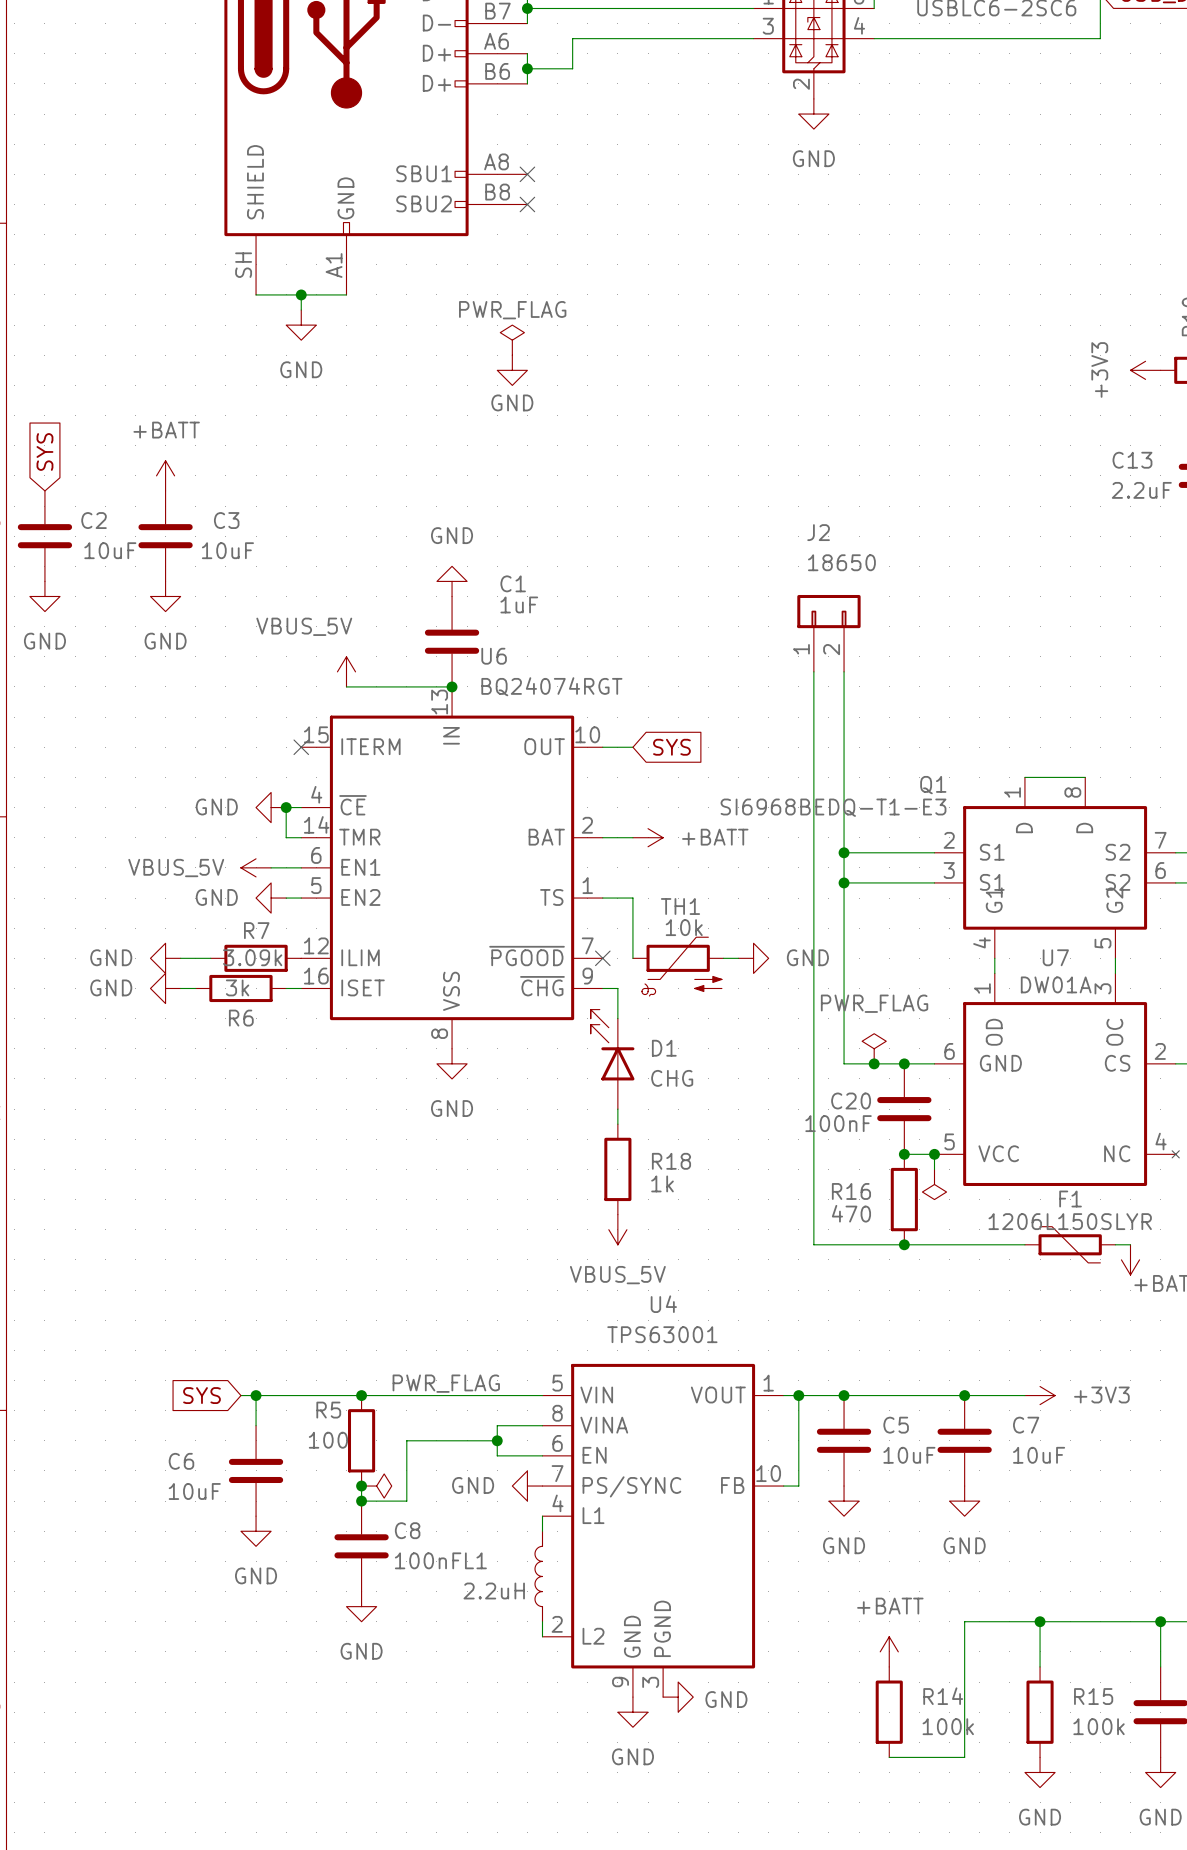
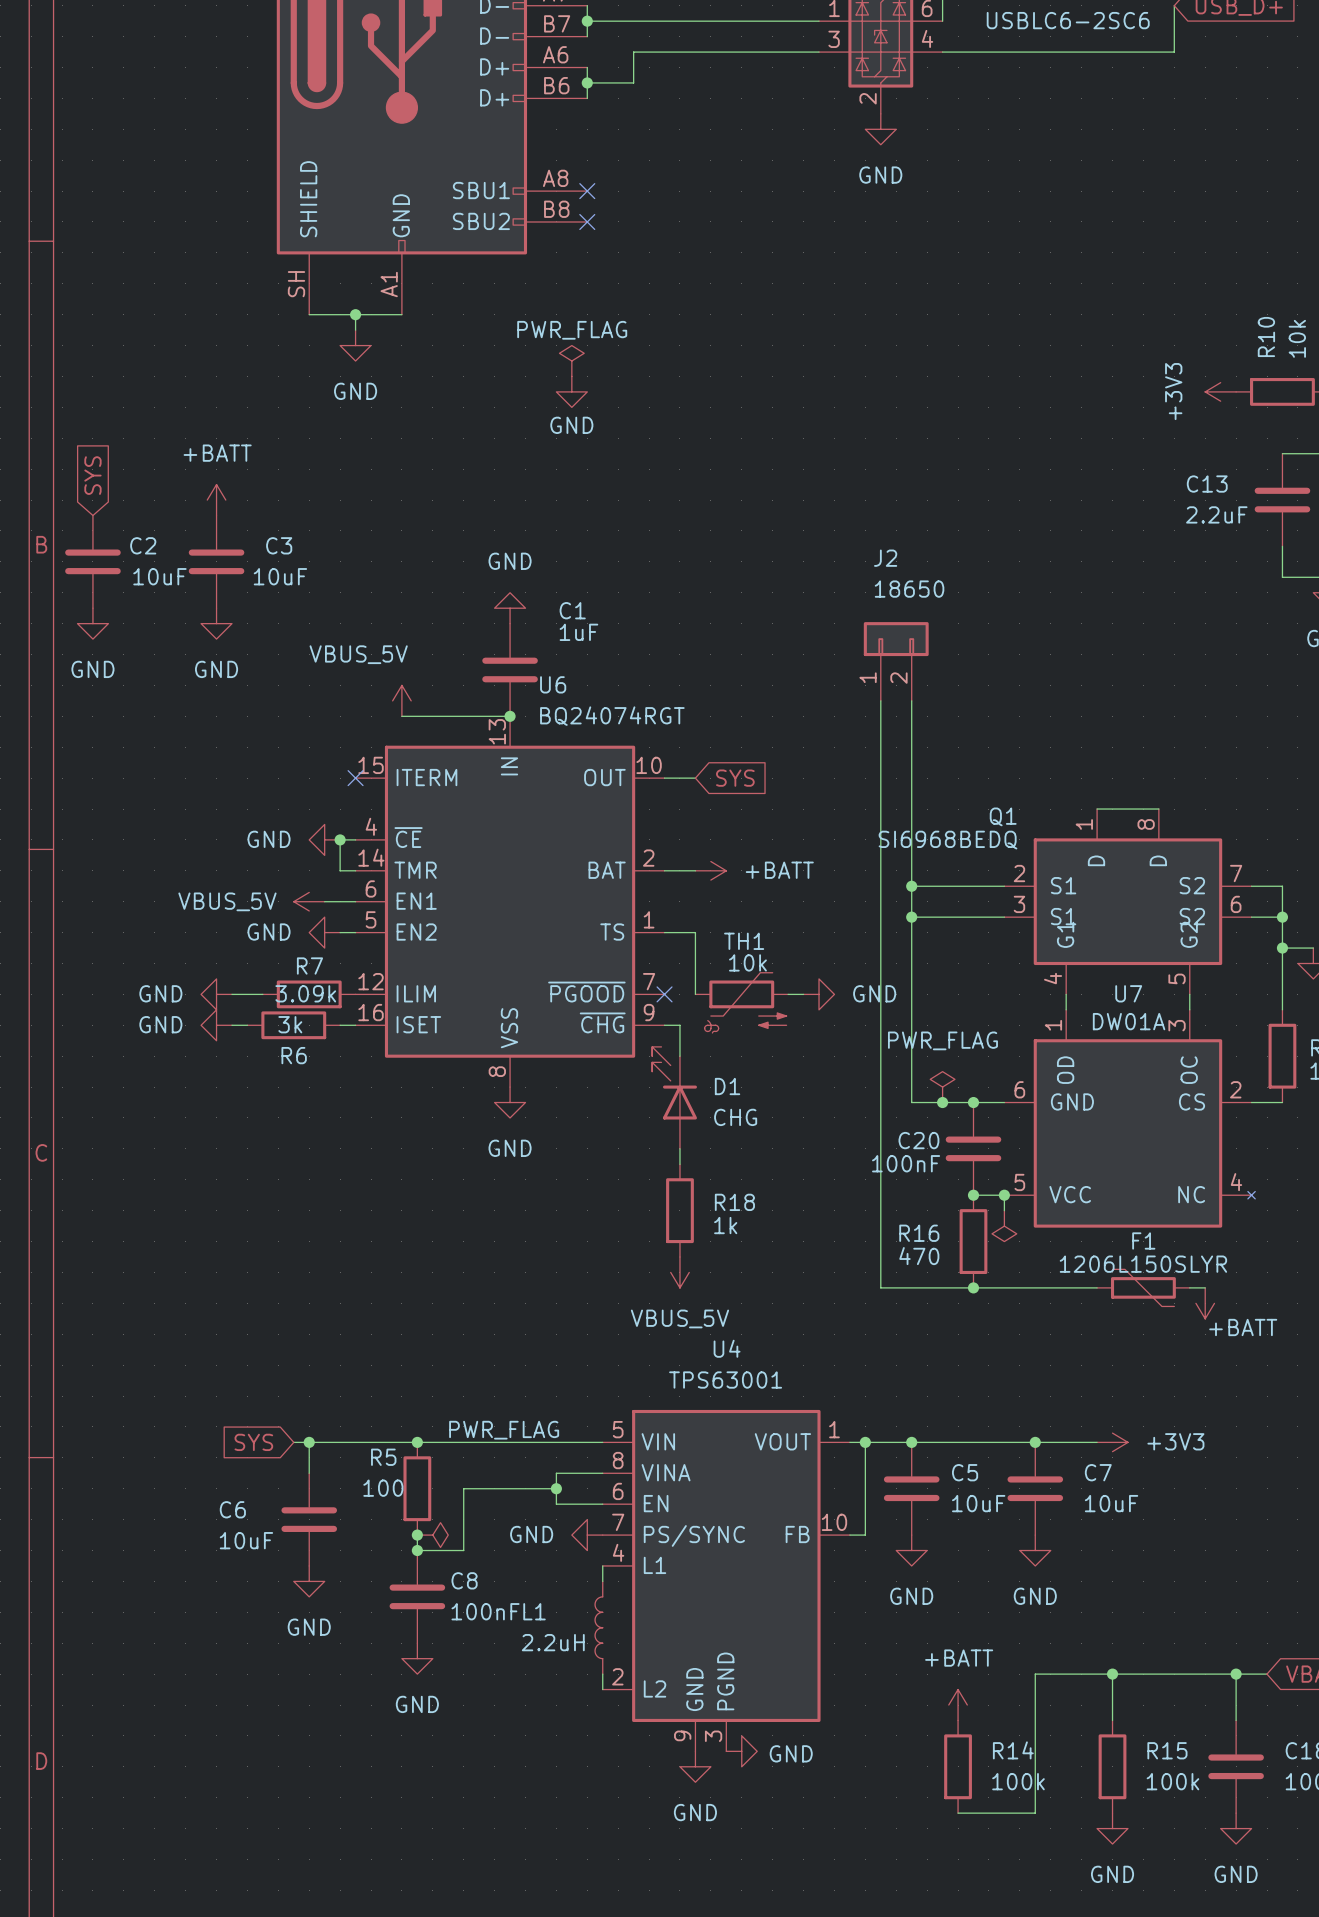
Q1 value: SI6968BEDQ-T1-E3 (833, 807) -> SI6968BEDQ (948, 840)

